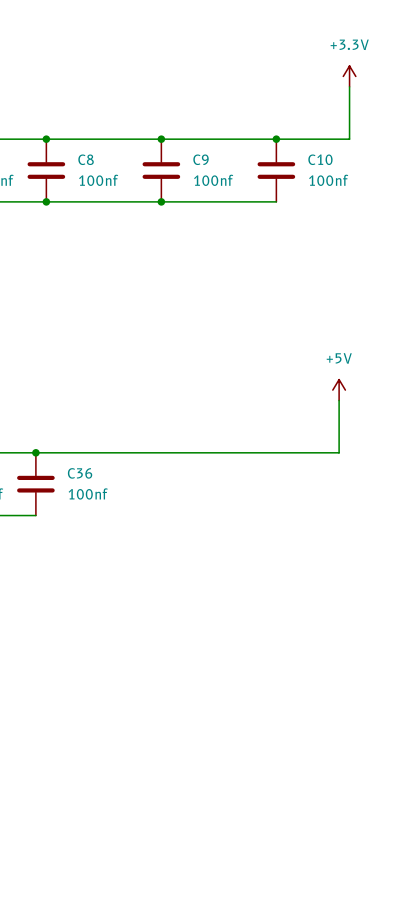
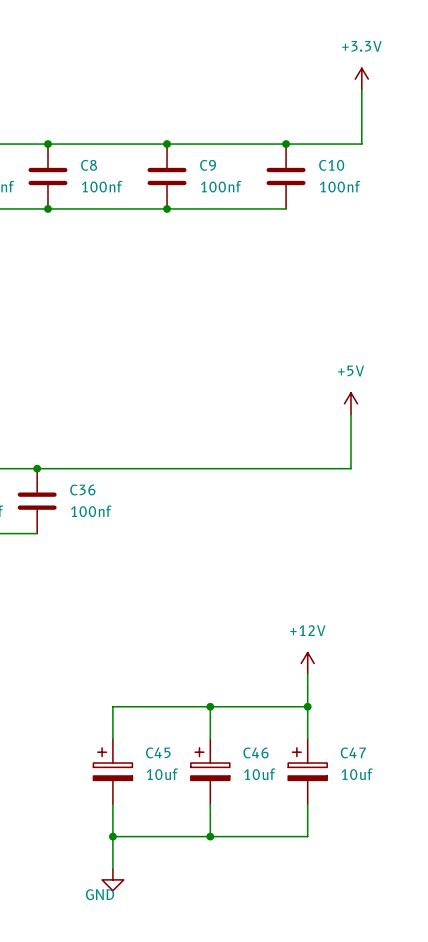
power symbol: none -> +12V (307, 663)
wire: none -> (307, 674) (307, 739)
wire: none -> (210, 706) (210, 739)
junction: none -> (210, 706)
wire: none -> (307, 706) (112, 706) (112, 739)
junction: none -> (307, 706)
C45: none -> 10uf (112, 771)
C46: none -> 10uf (210, 771)
C47: none -> 10uf (307, 771)
wire: none -> (112, 804) (112, 869)
wire: none -> (210, 804) (210, 836)
wire: none -> (307, 804) (307, 836) (112, 836)
junction: none -> (112, 836)
junction: none -> (210, 836)
power symbol: none -> GND (112, 879)

